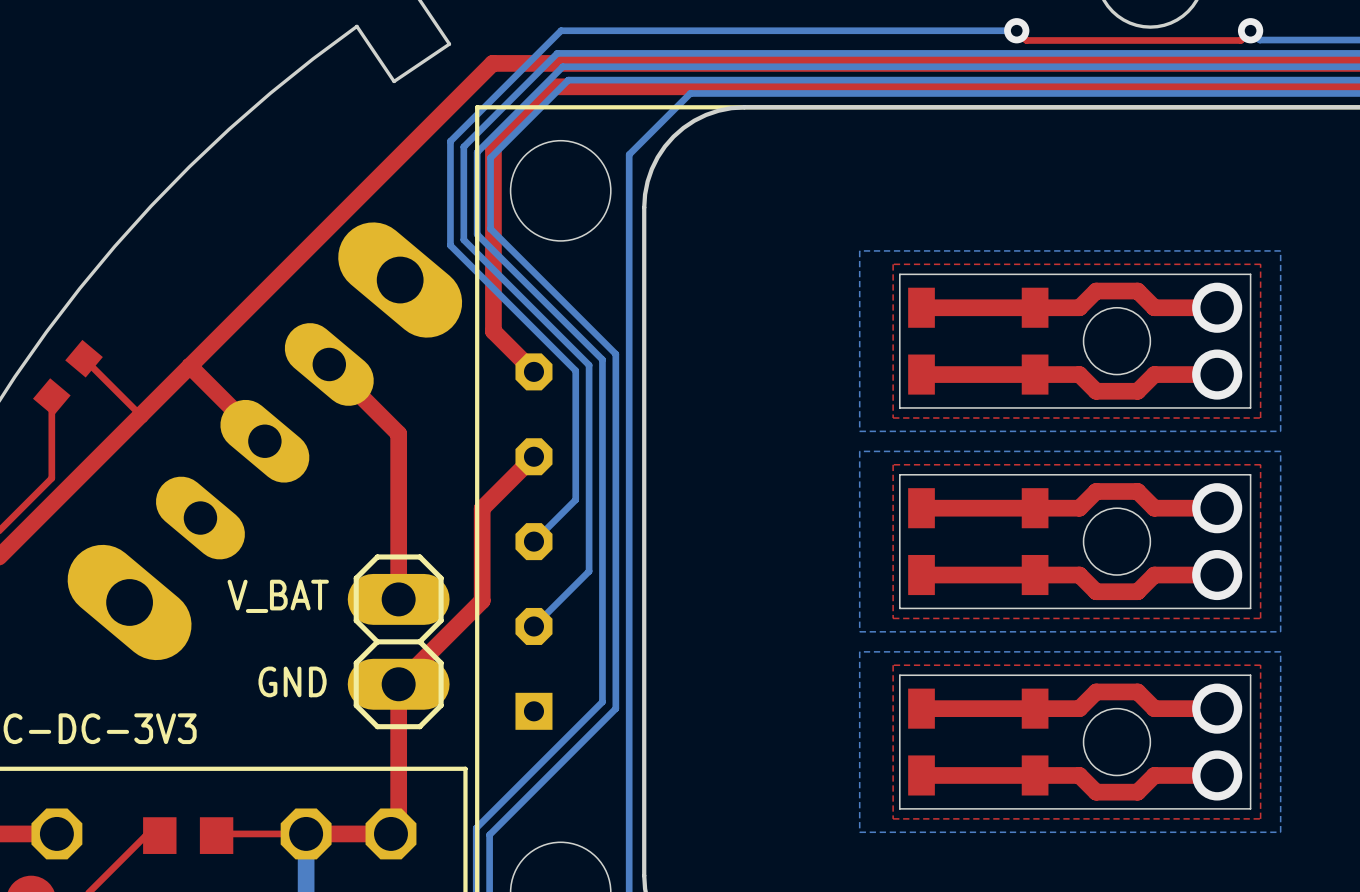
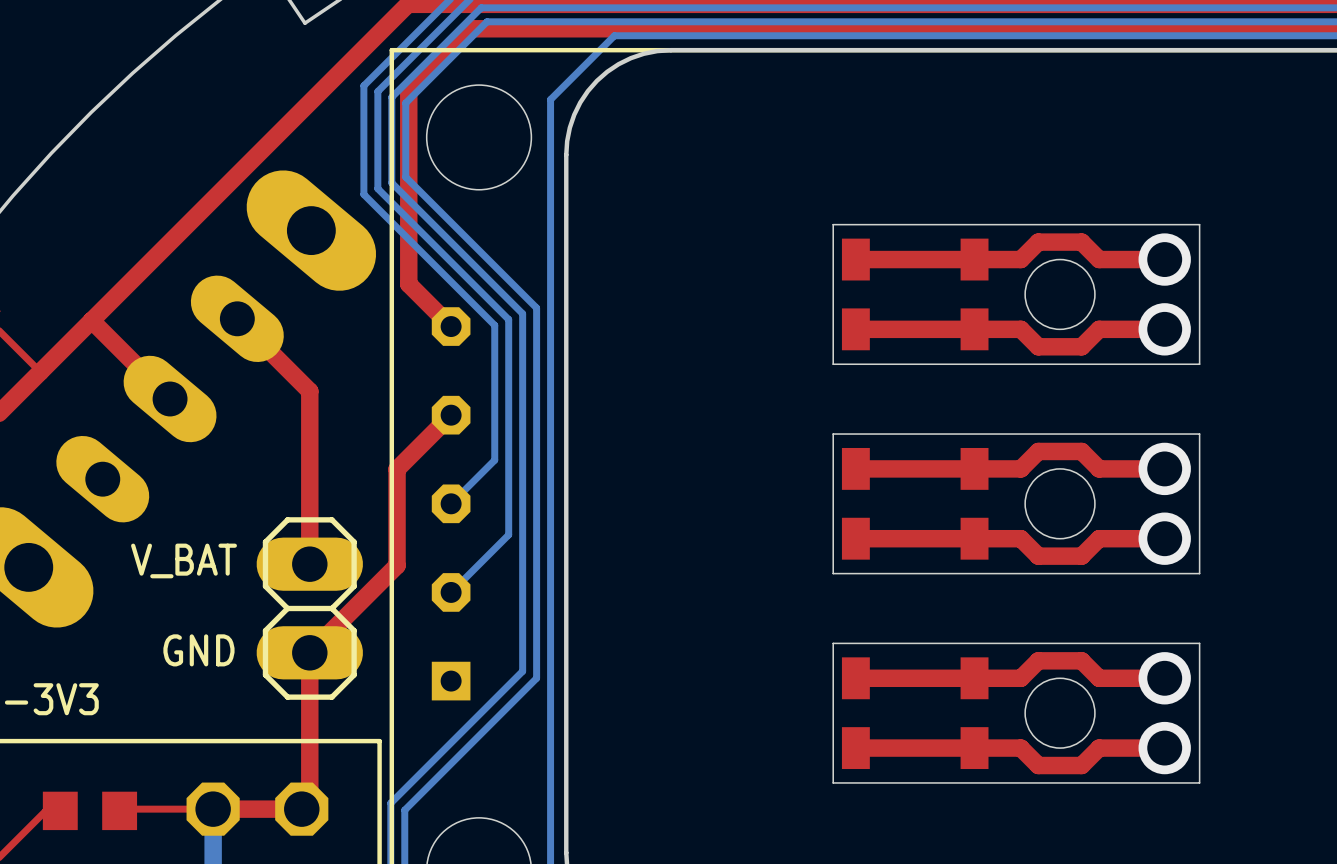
bottom zone outline: (1280, 250) (1280, 431) (859, 431) (859, 250) (1280, 250) -> none
top zone outline: (1260, 264) (1260, 418) (893, 418) (893, 264) (1260, 264) -> none
bottom zone outline: (1280, 451) (1280, 631) (859, 631) (859, 451) (1280, 451) -> none
top zone outline: (1260, 464) (1260, 618) (893, 618) (893, 464) (1260, 464) -> none
bottom zone outline: (1280, 651) (859, 651) (859, 832) (1280, 832) (1280, 651) -> none
top zone outline: (1260, 665) (893, 665) (893, 818) (1260, 818) (1260, 665) -> none

